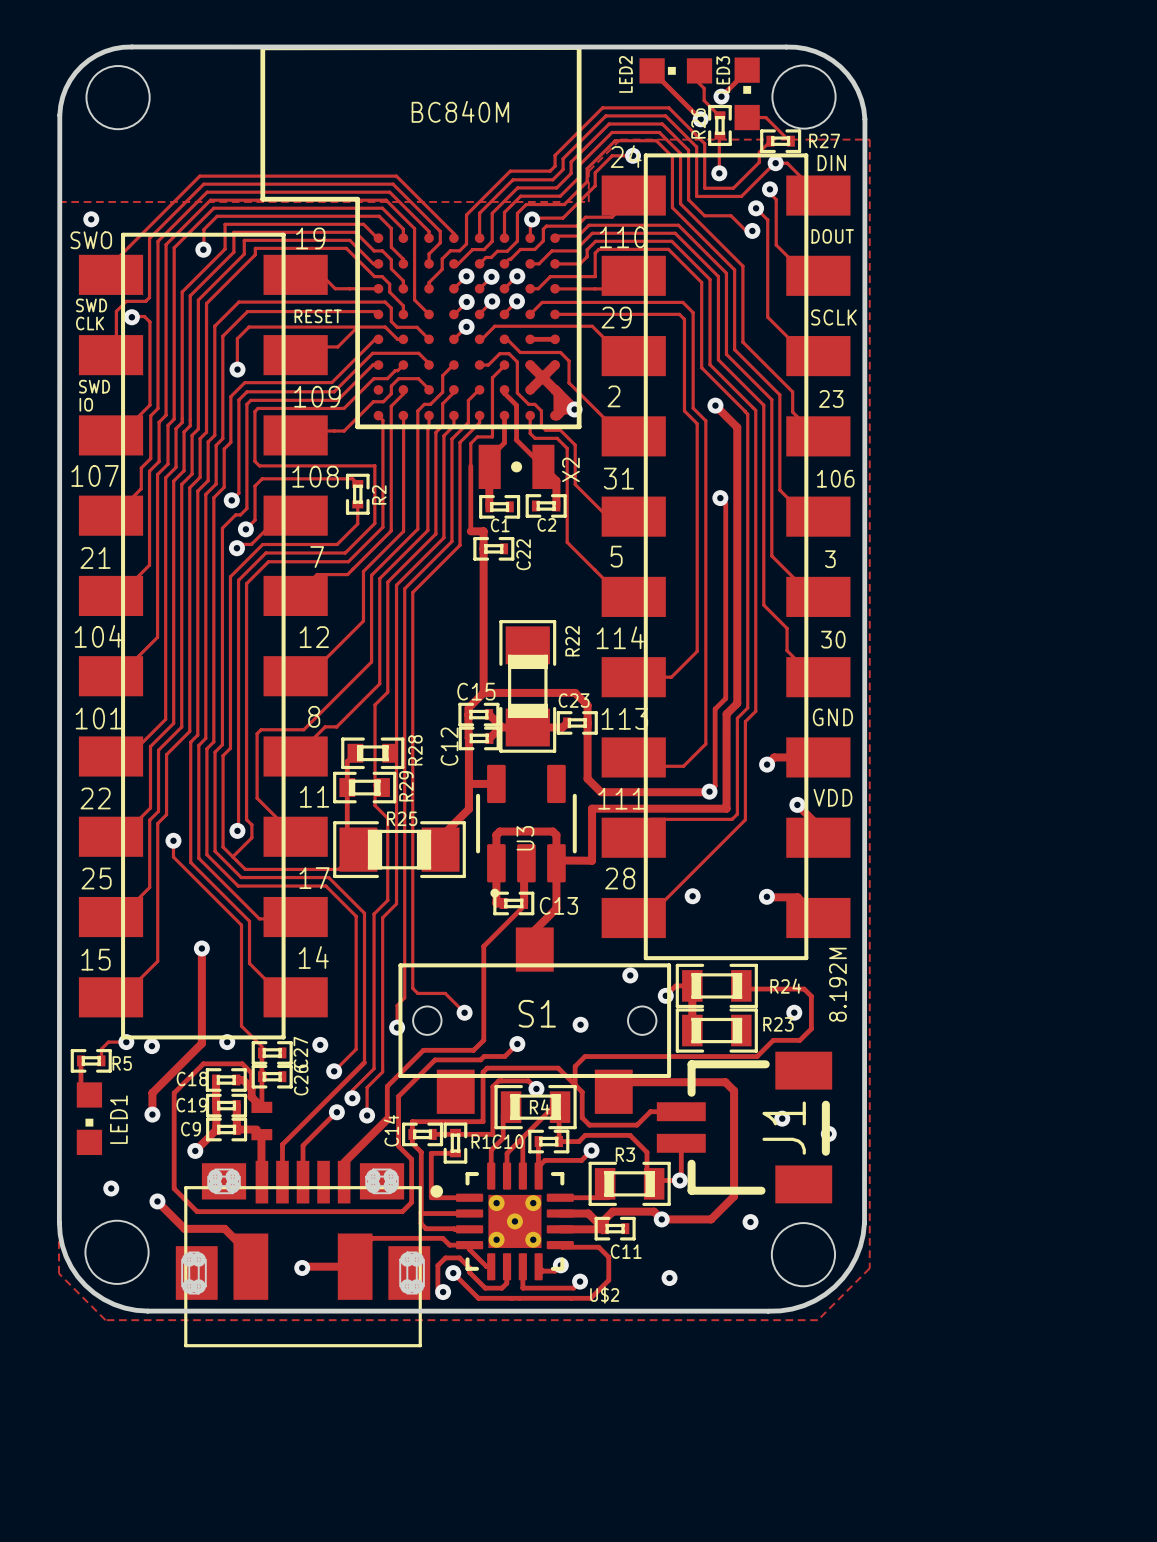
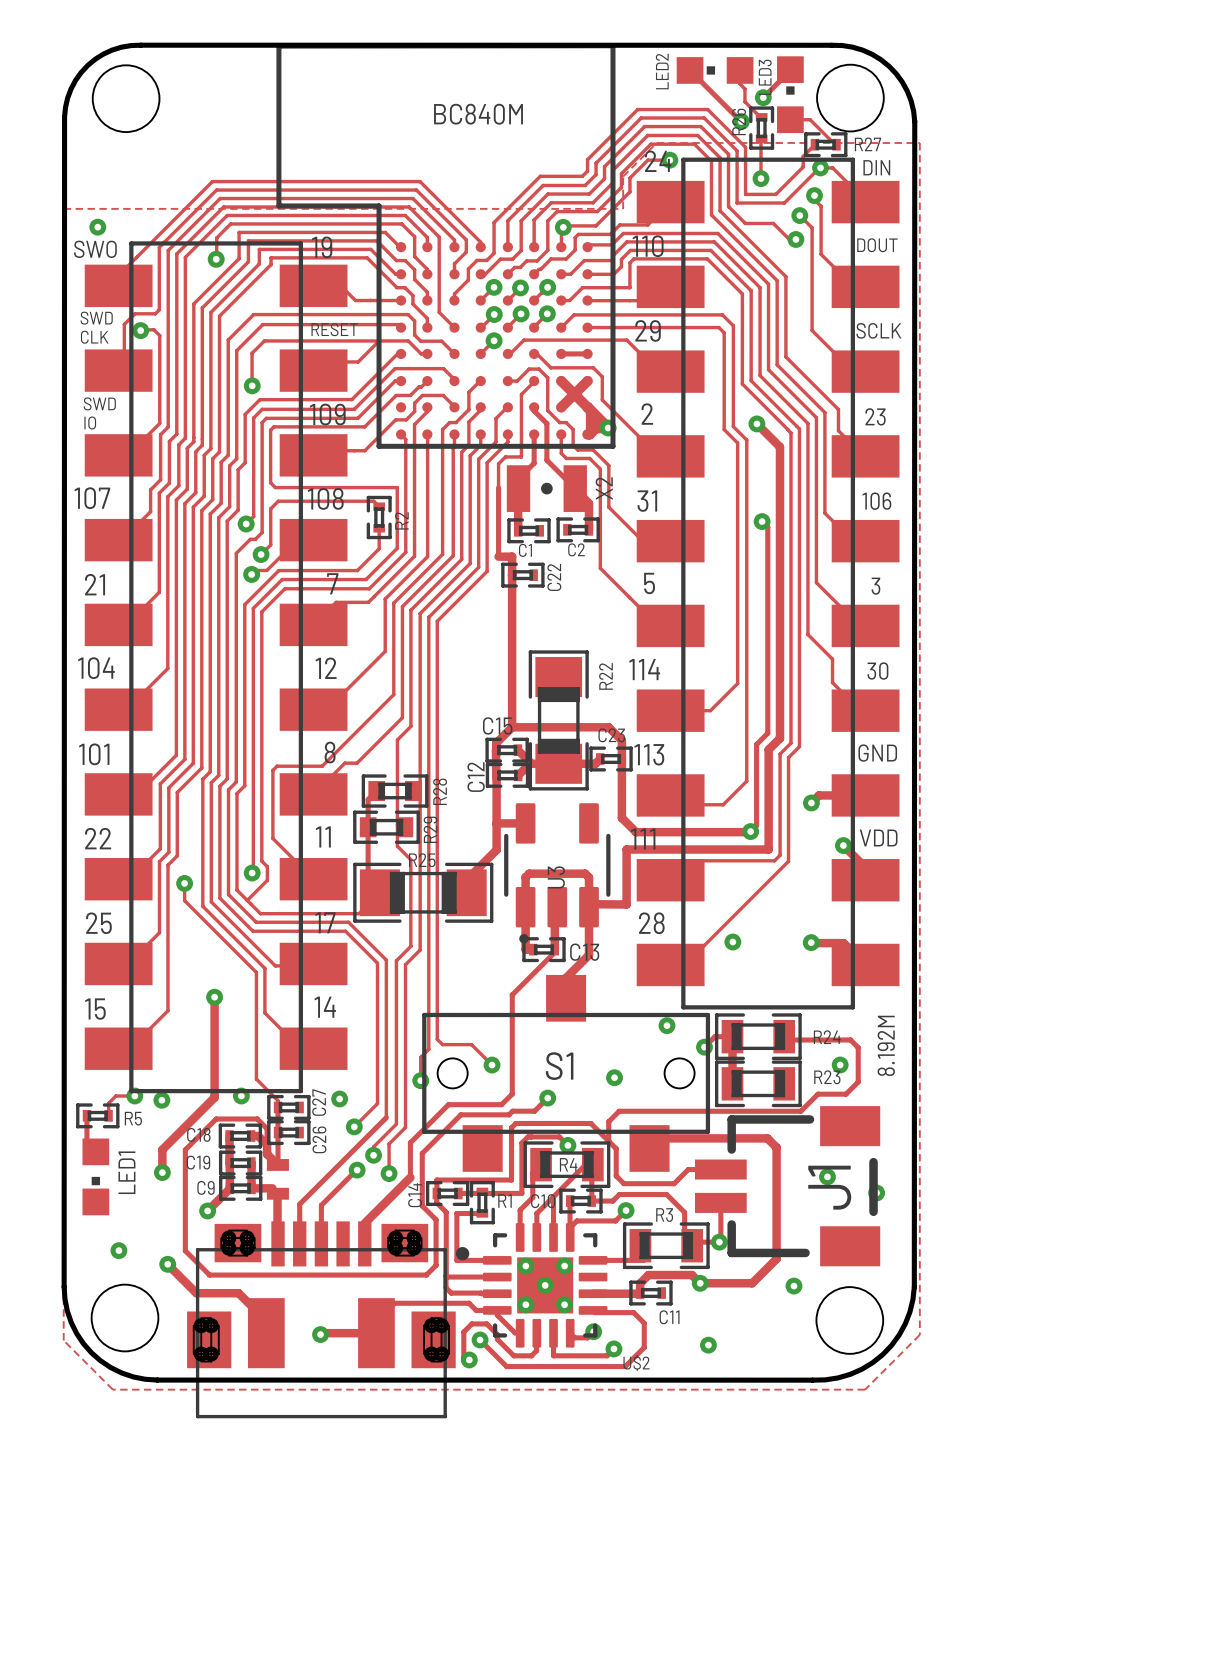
track: (560, 1213) (588, 1213) (604, 1229) -> none

